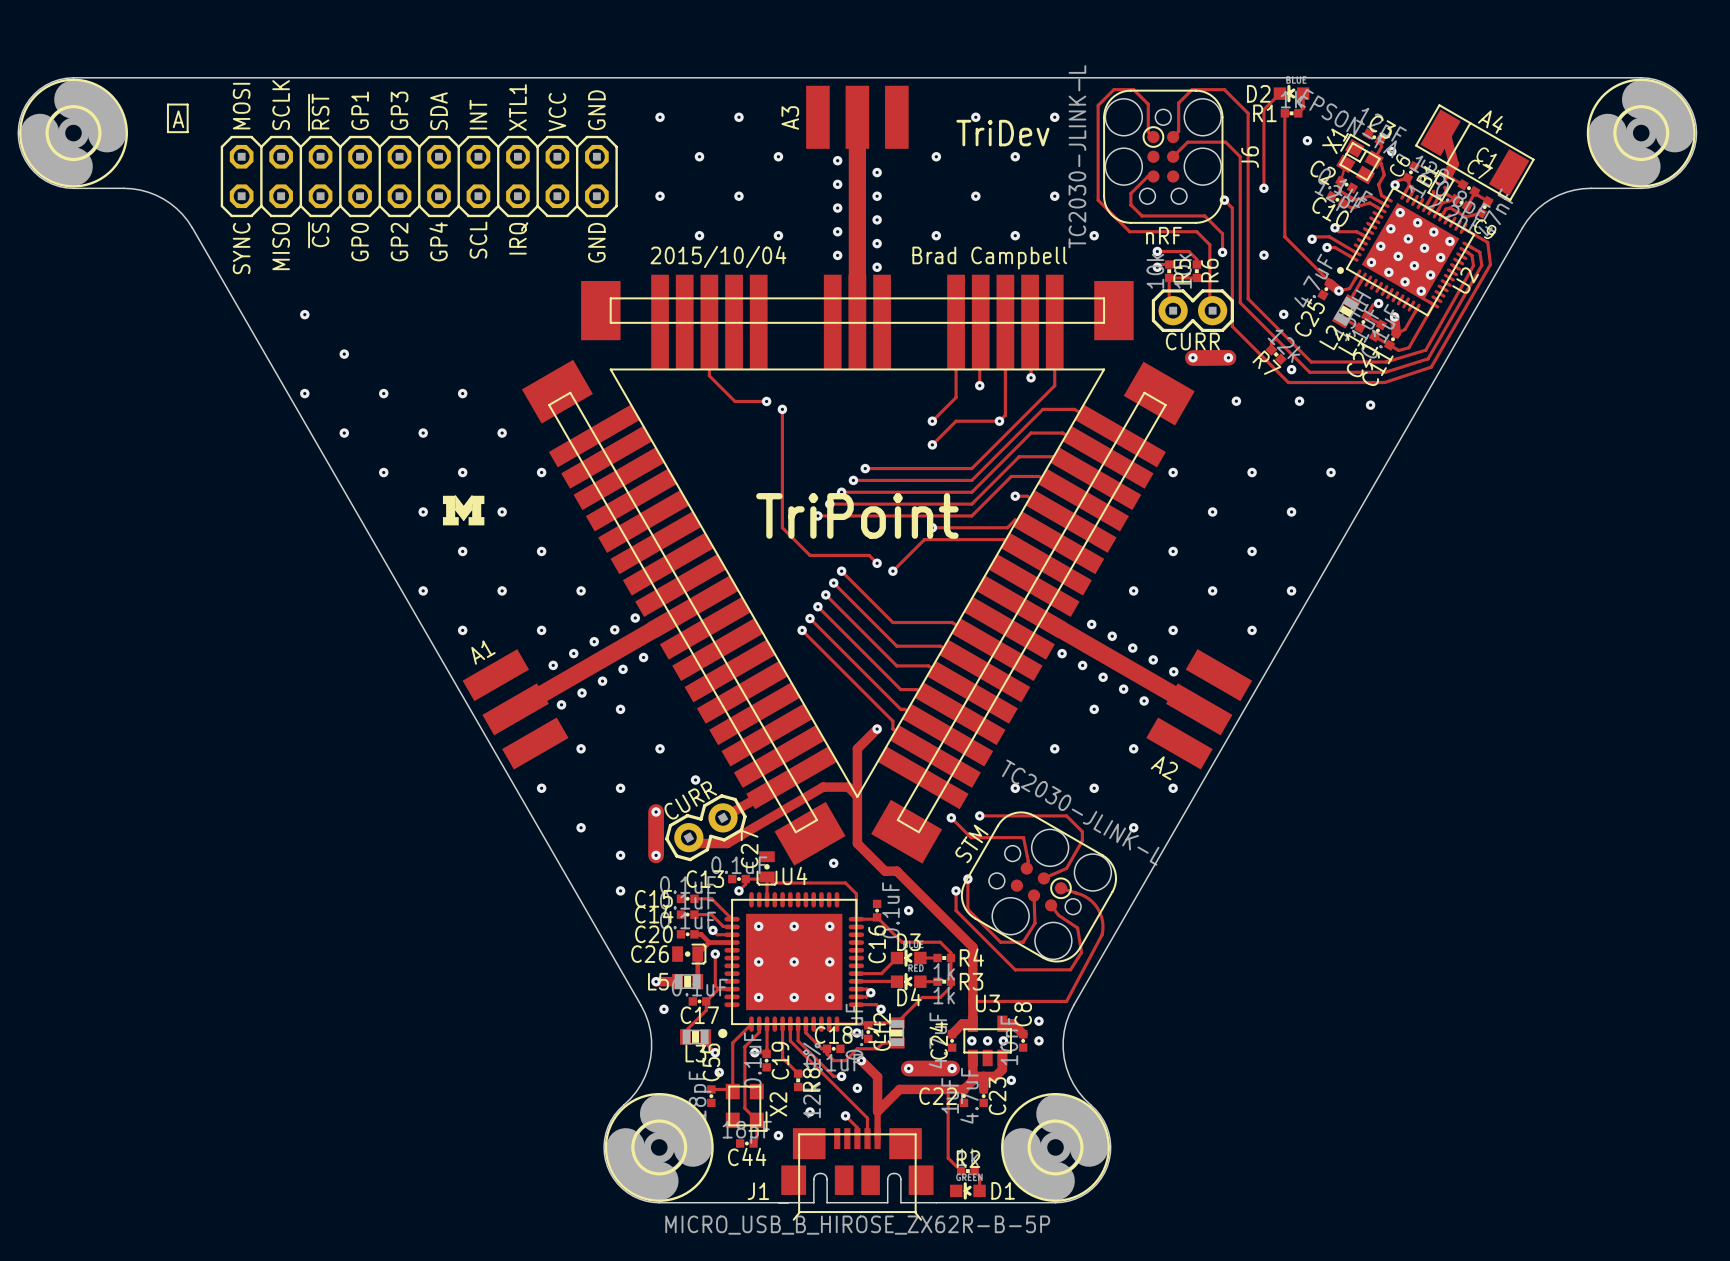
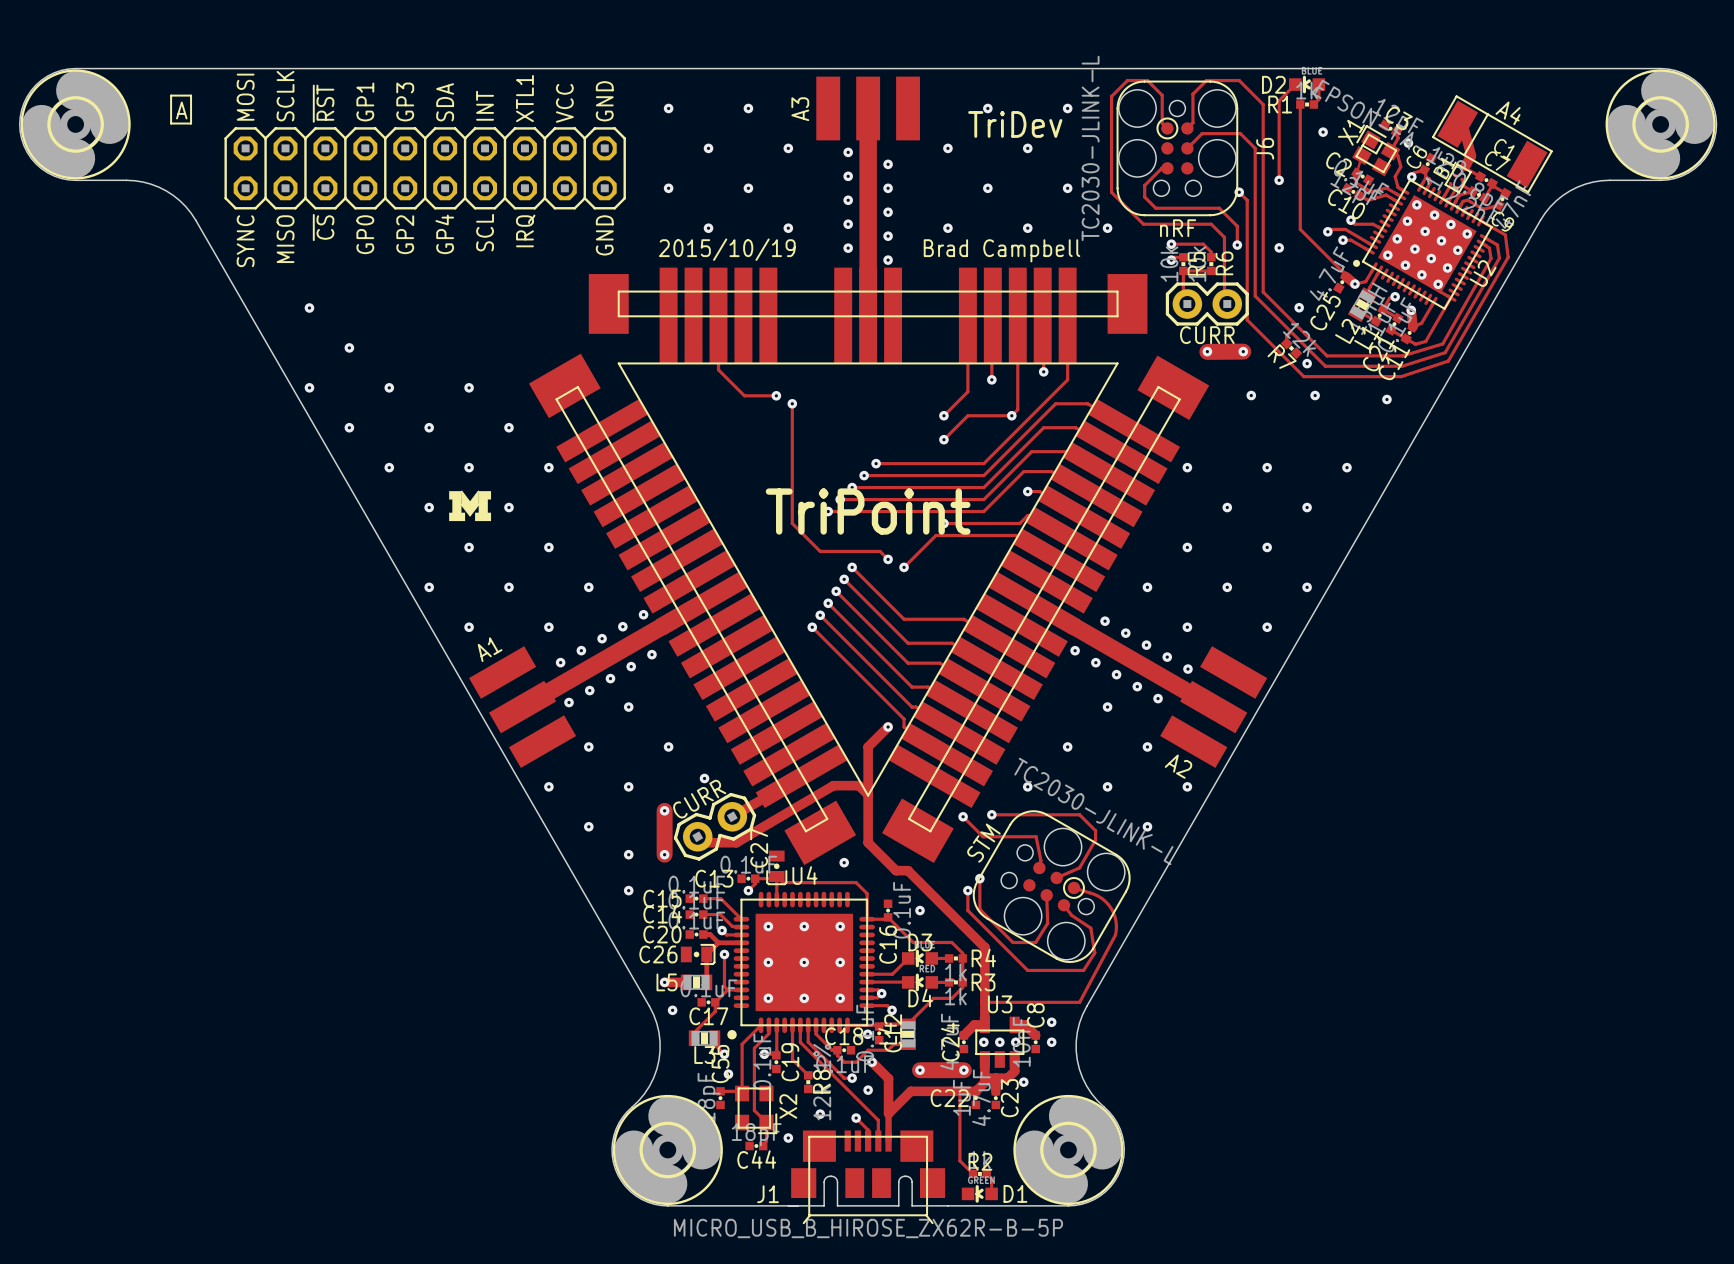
text: 2015/10/04 (718, 256) -> 2015/10/19 (727, 249)

